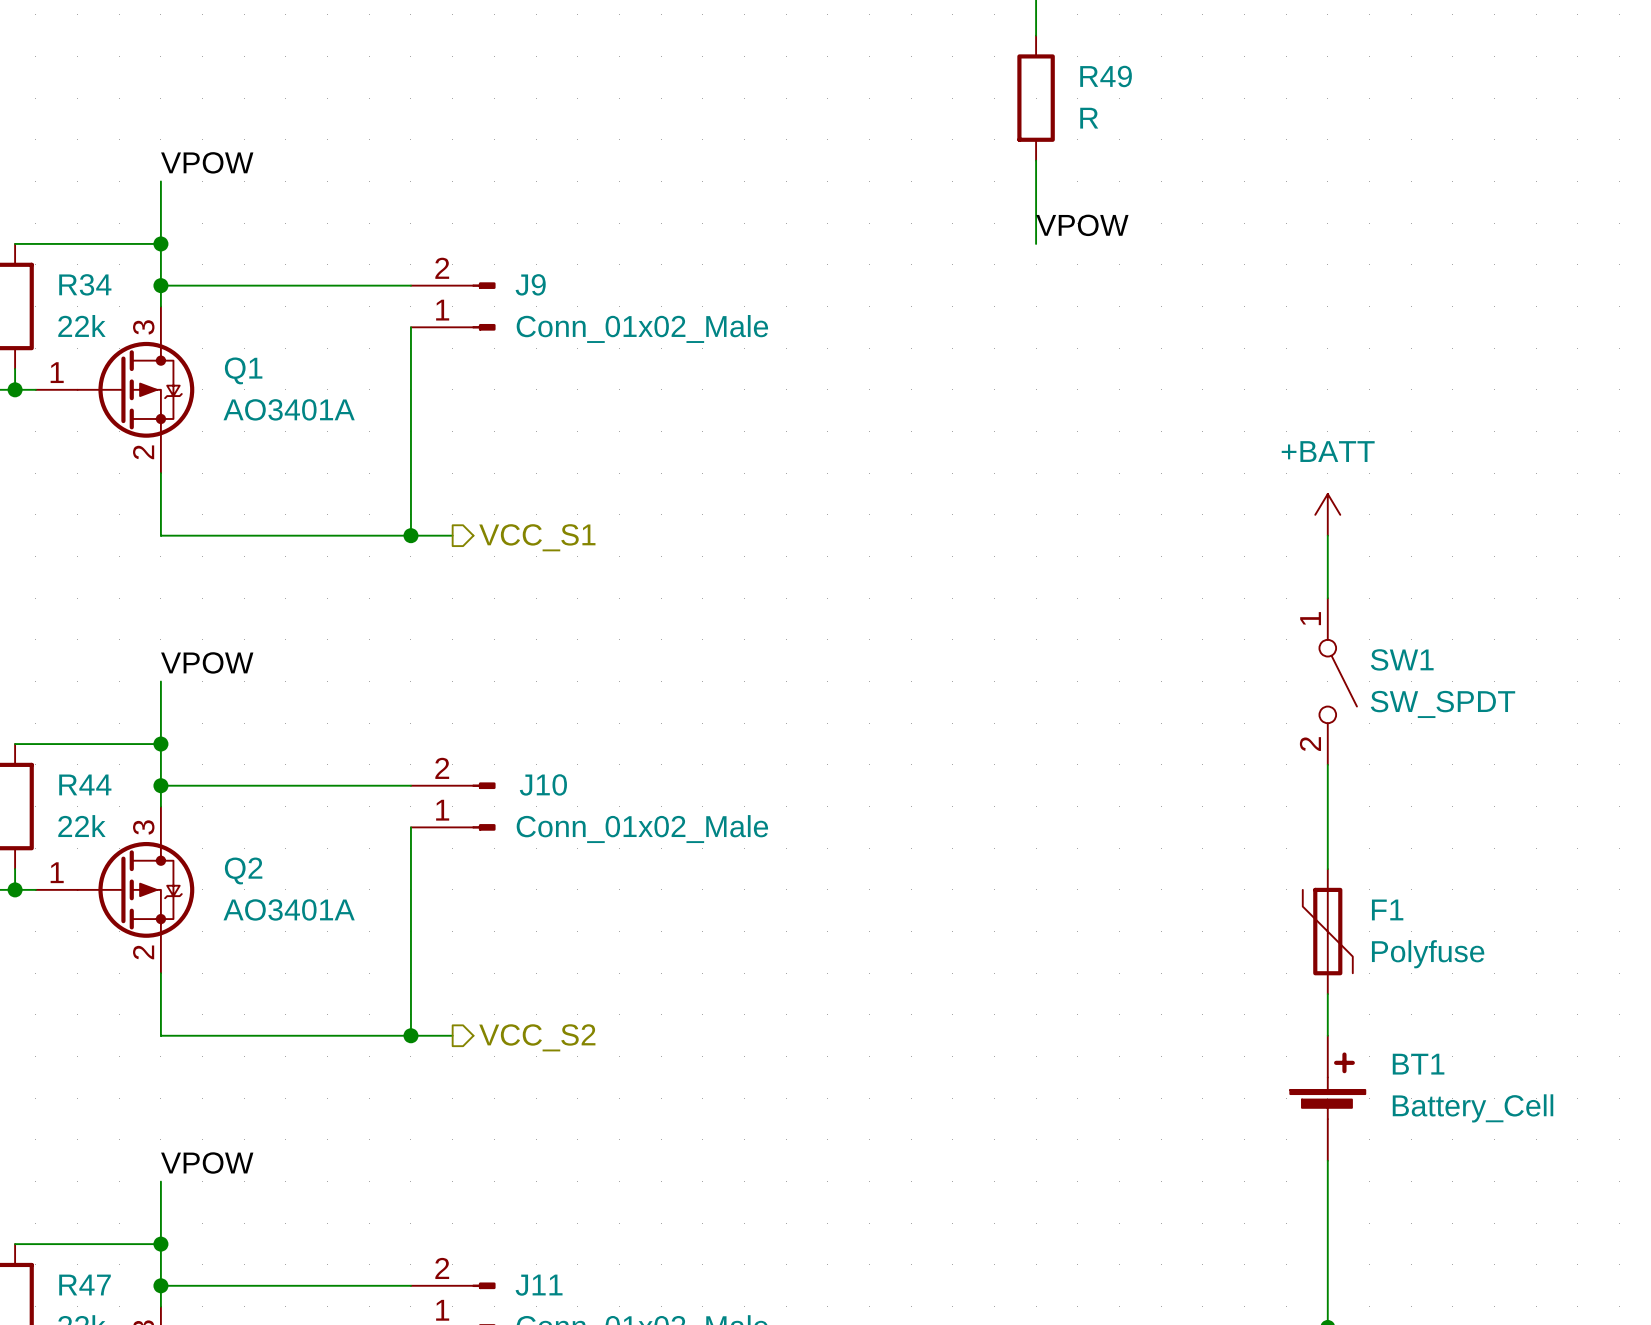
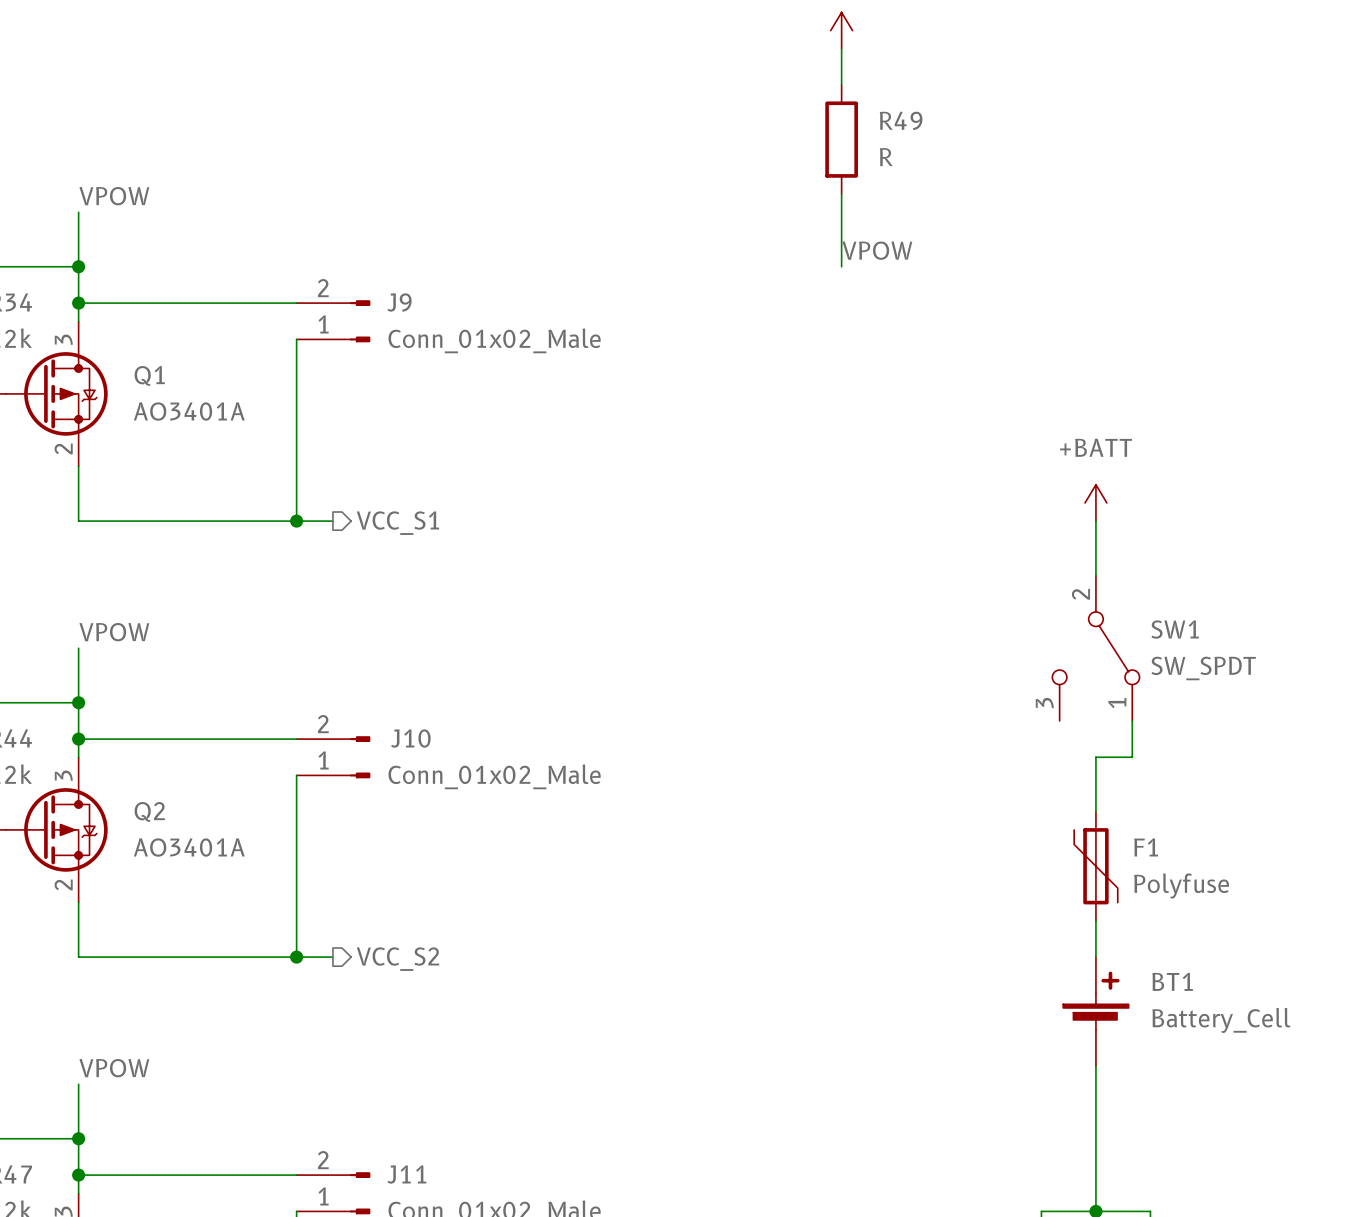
SW1 symbol: [1319, 598, 1357, 765] -> [1052, 575, 1140, 721]
wire: (1327, 764) (1327, 806) -> (1132, 720) (1132, 757) (1095, 757)

